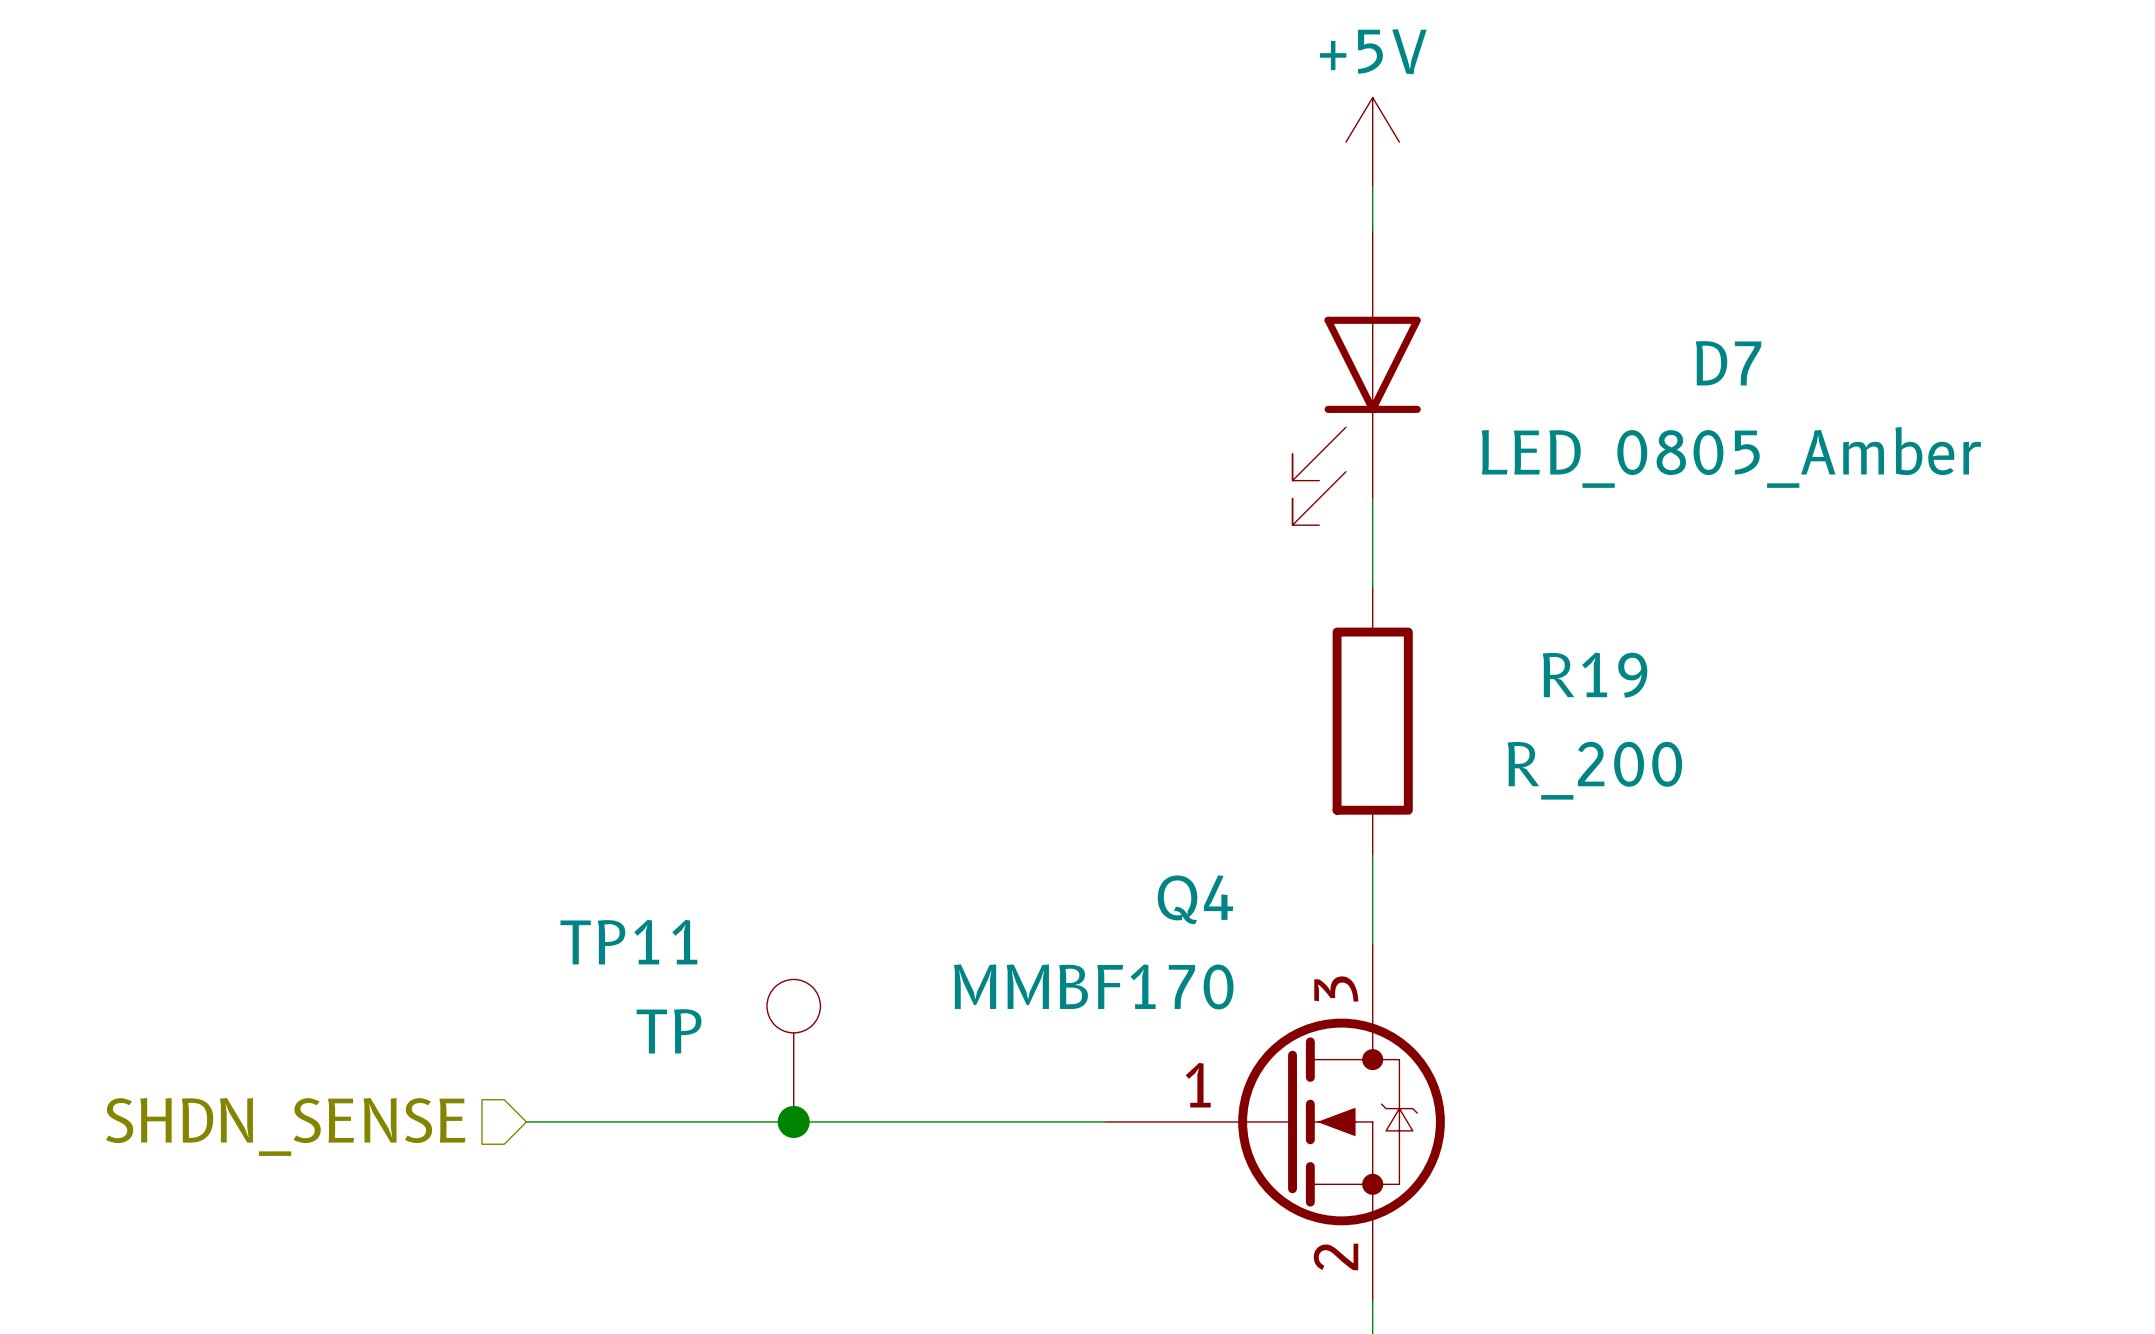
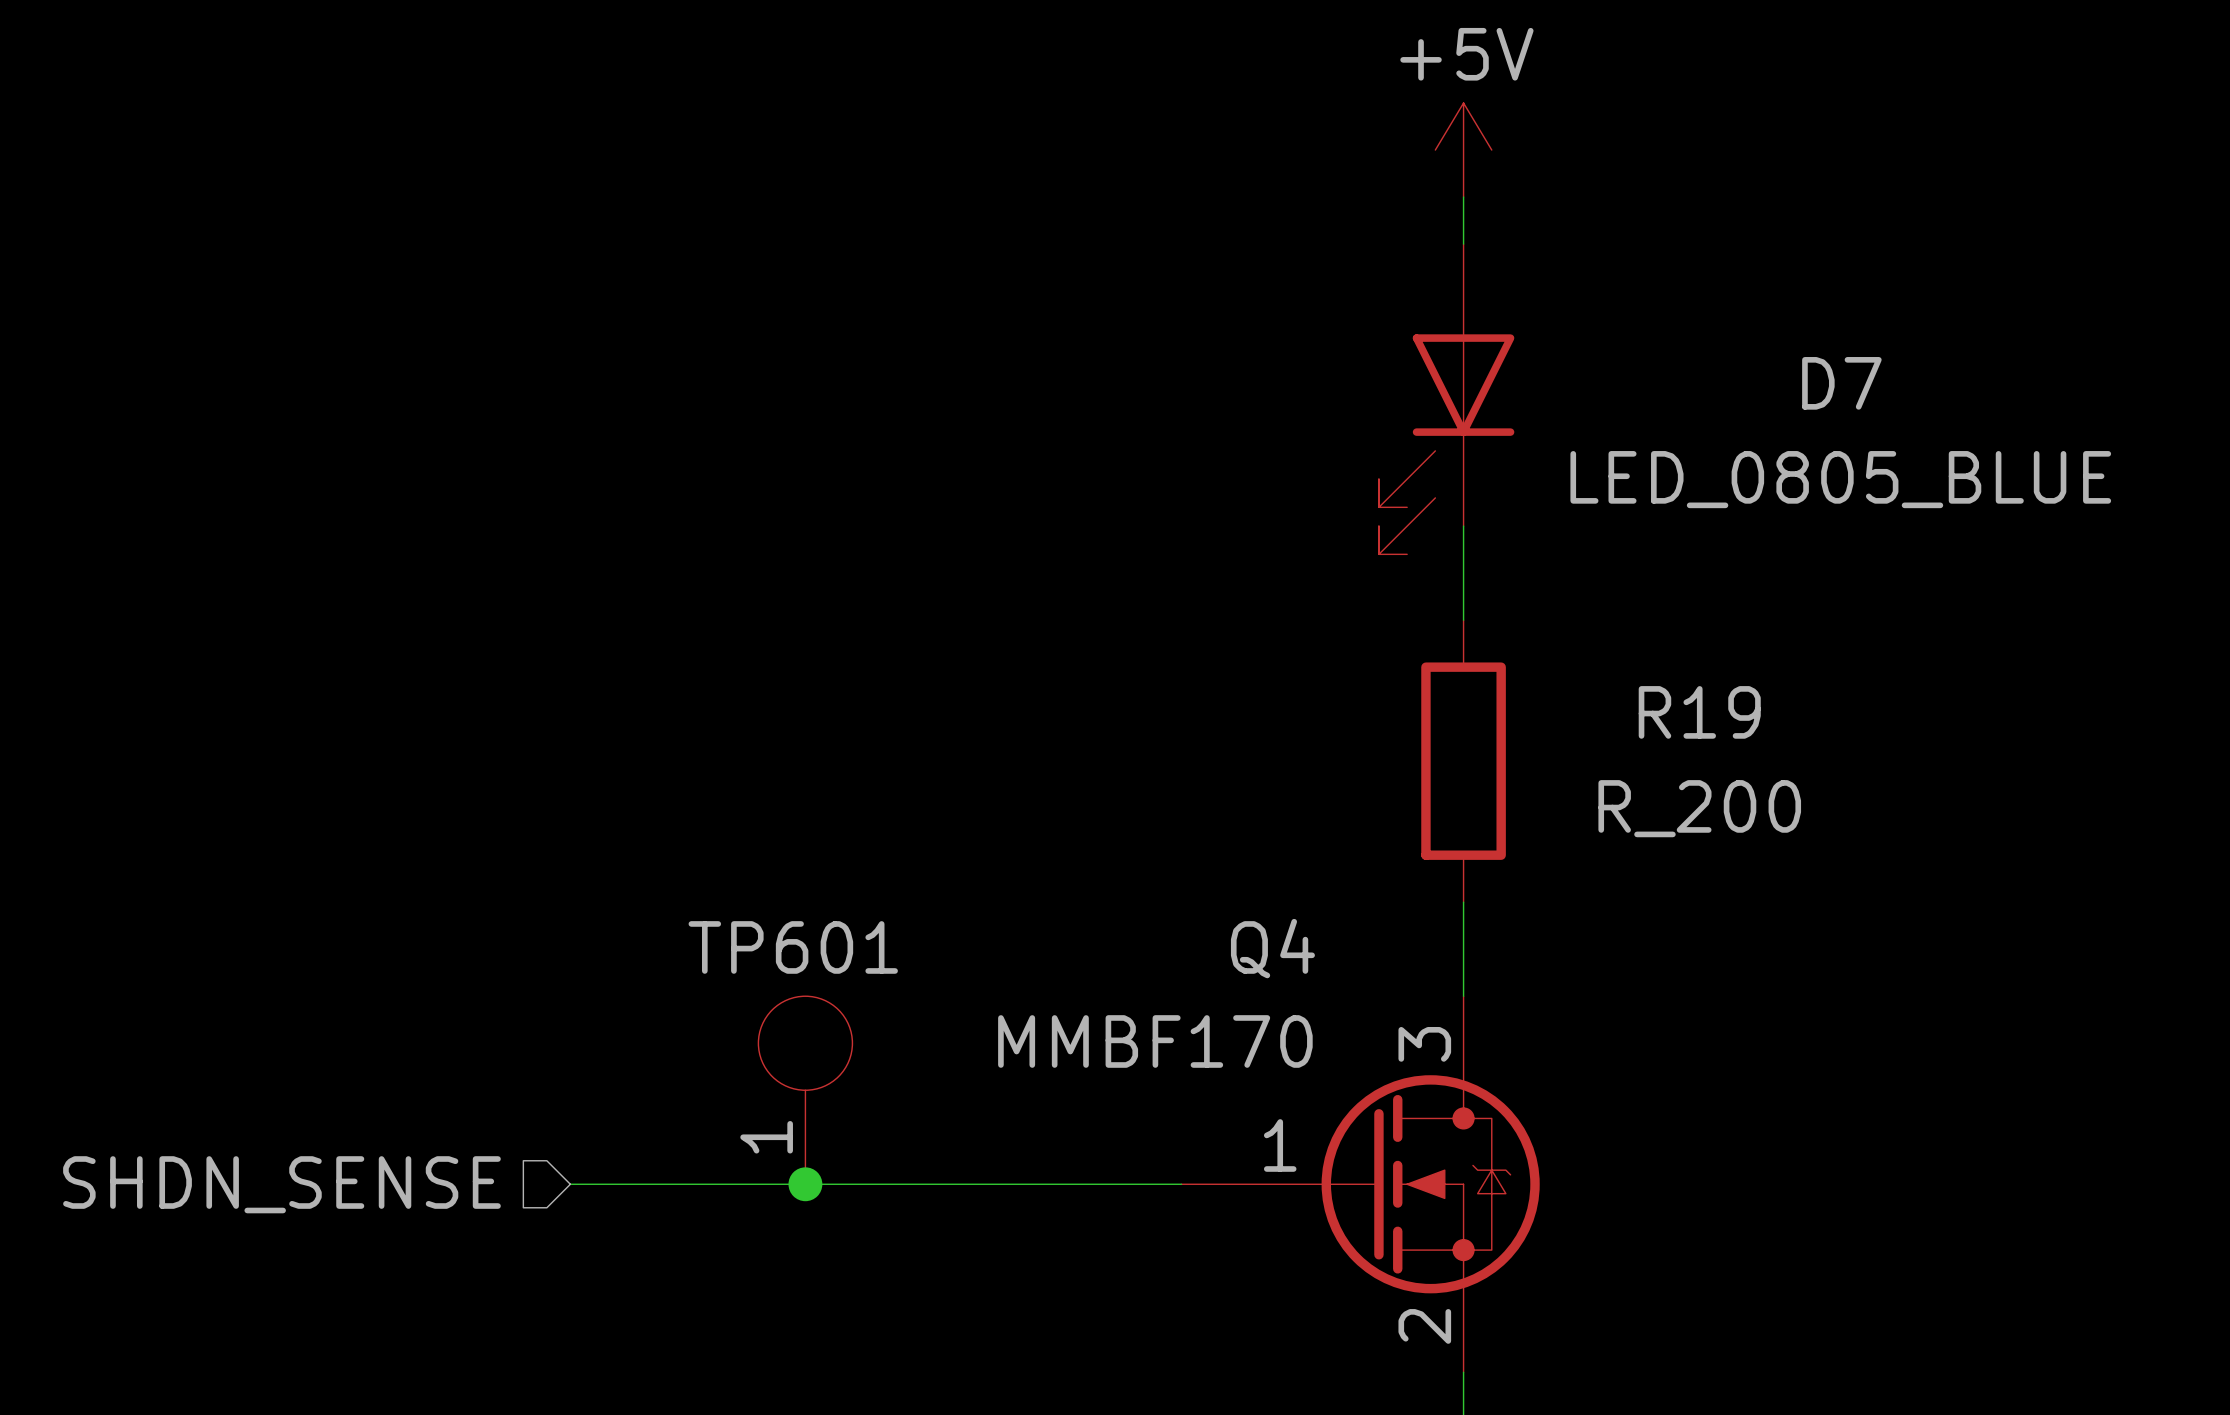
D7 value: LED_0805_Amber (1731, 457) -> LED_0805_BLUE (1840, 479)
TP601: none -> (805, 1090)
TP11: TP (793, 1050) -> none
junction position: (793, 1121) -> (805, 1184)

